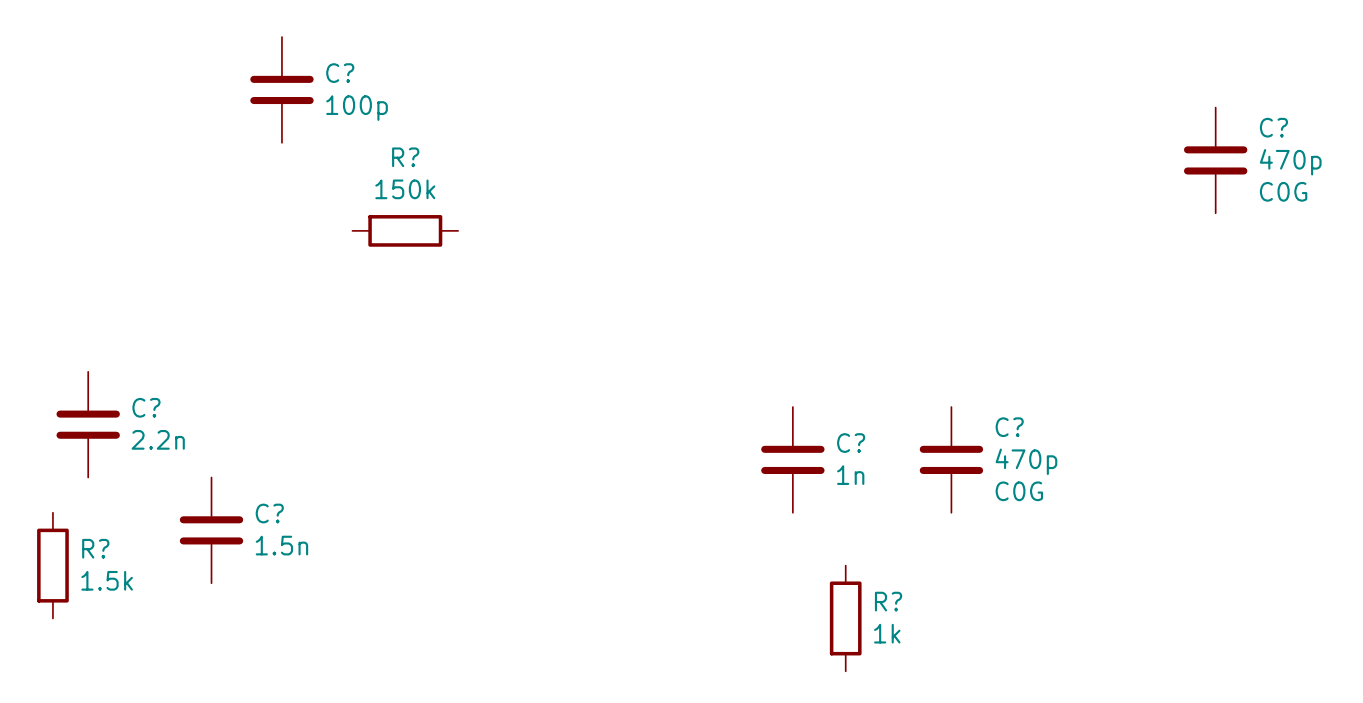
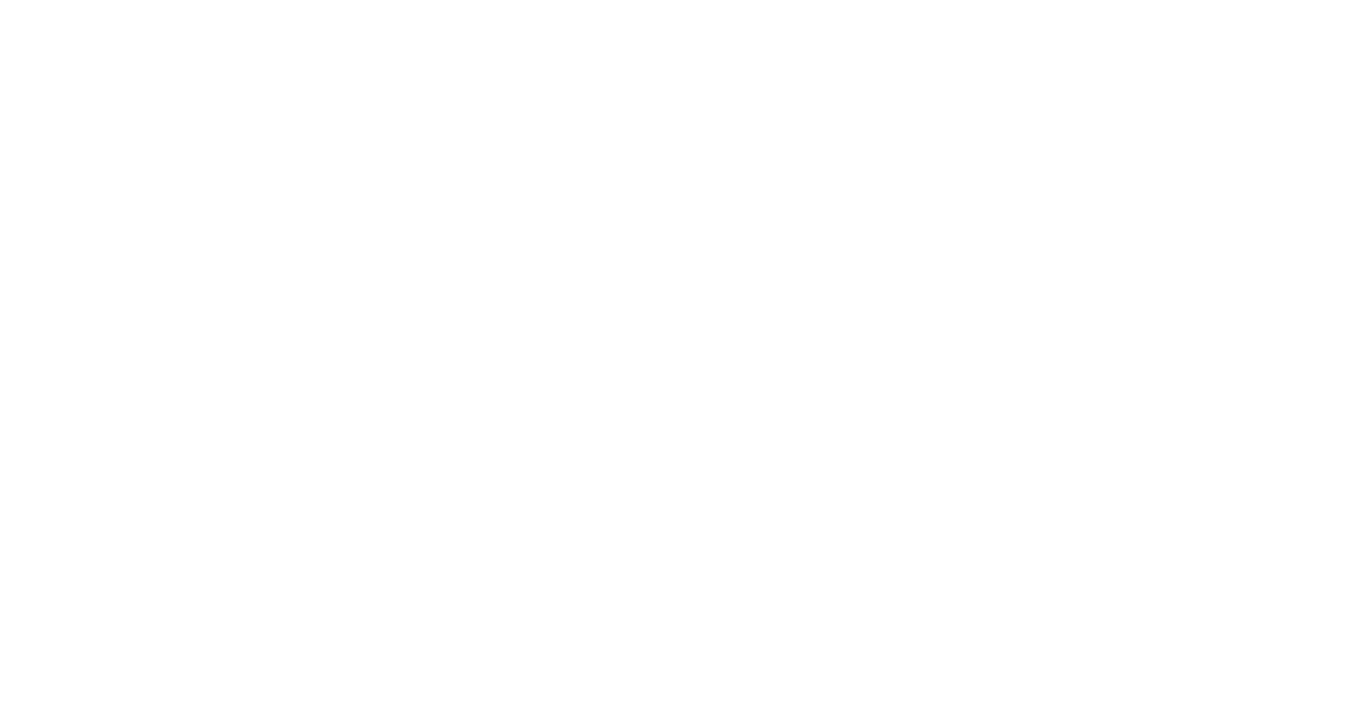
C?: 100p (281, 89) -> none
C?: 470p (1215, 160) -> none
R?: 150k (405, 230) -> none
C?: 2.2n (88, 424) -> none
C?: 1n (792, 459) -> none
C?: 470p (951, 459) -> none
C?: 1.5n (211, 530) -> none
R?: 1.5k (52, 565) -> none
R?: 1k (845, 618) -> none

